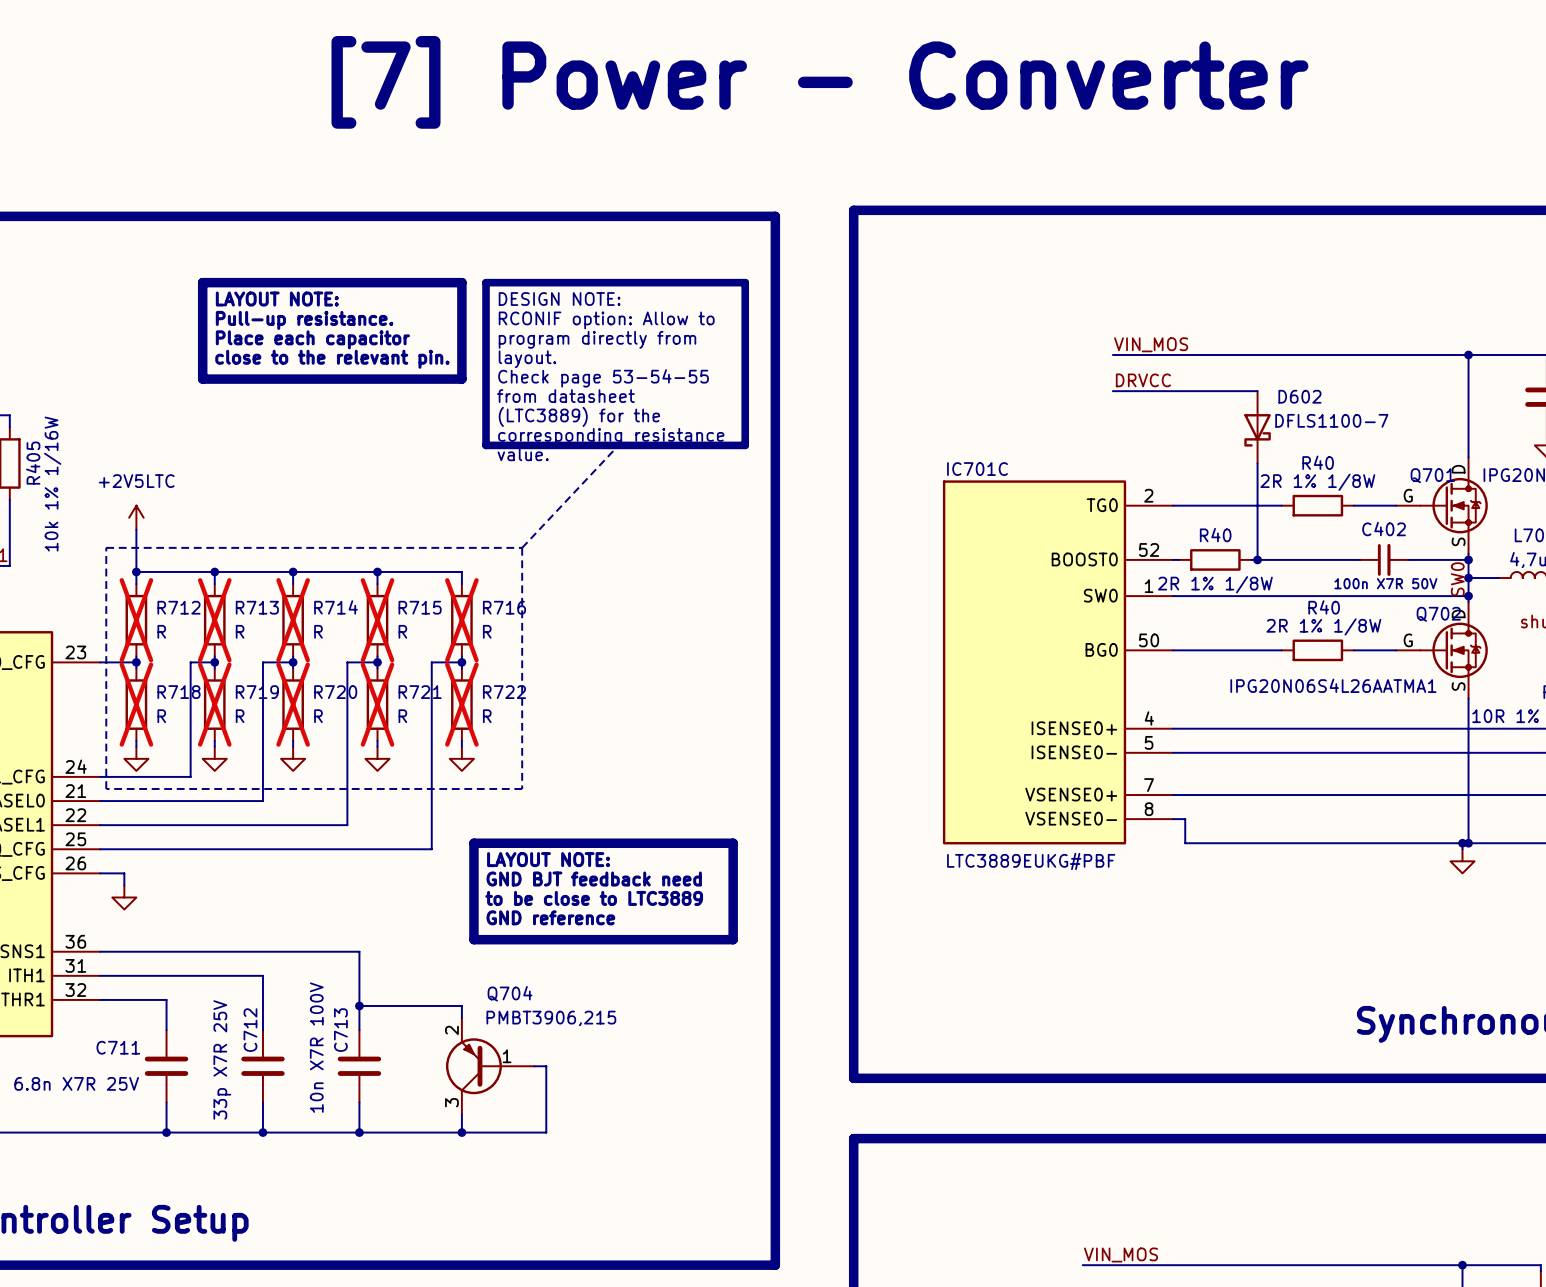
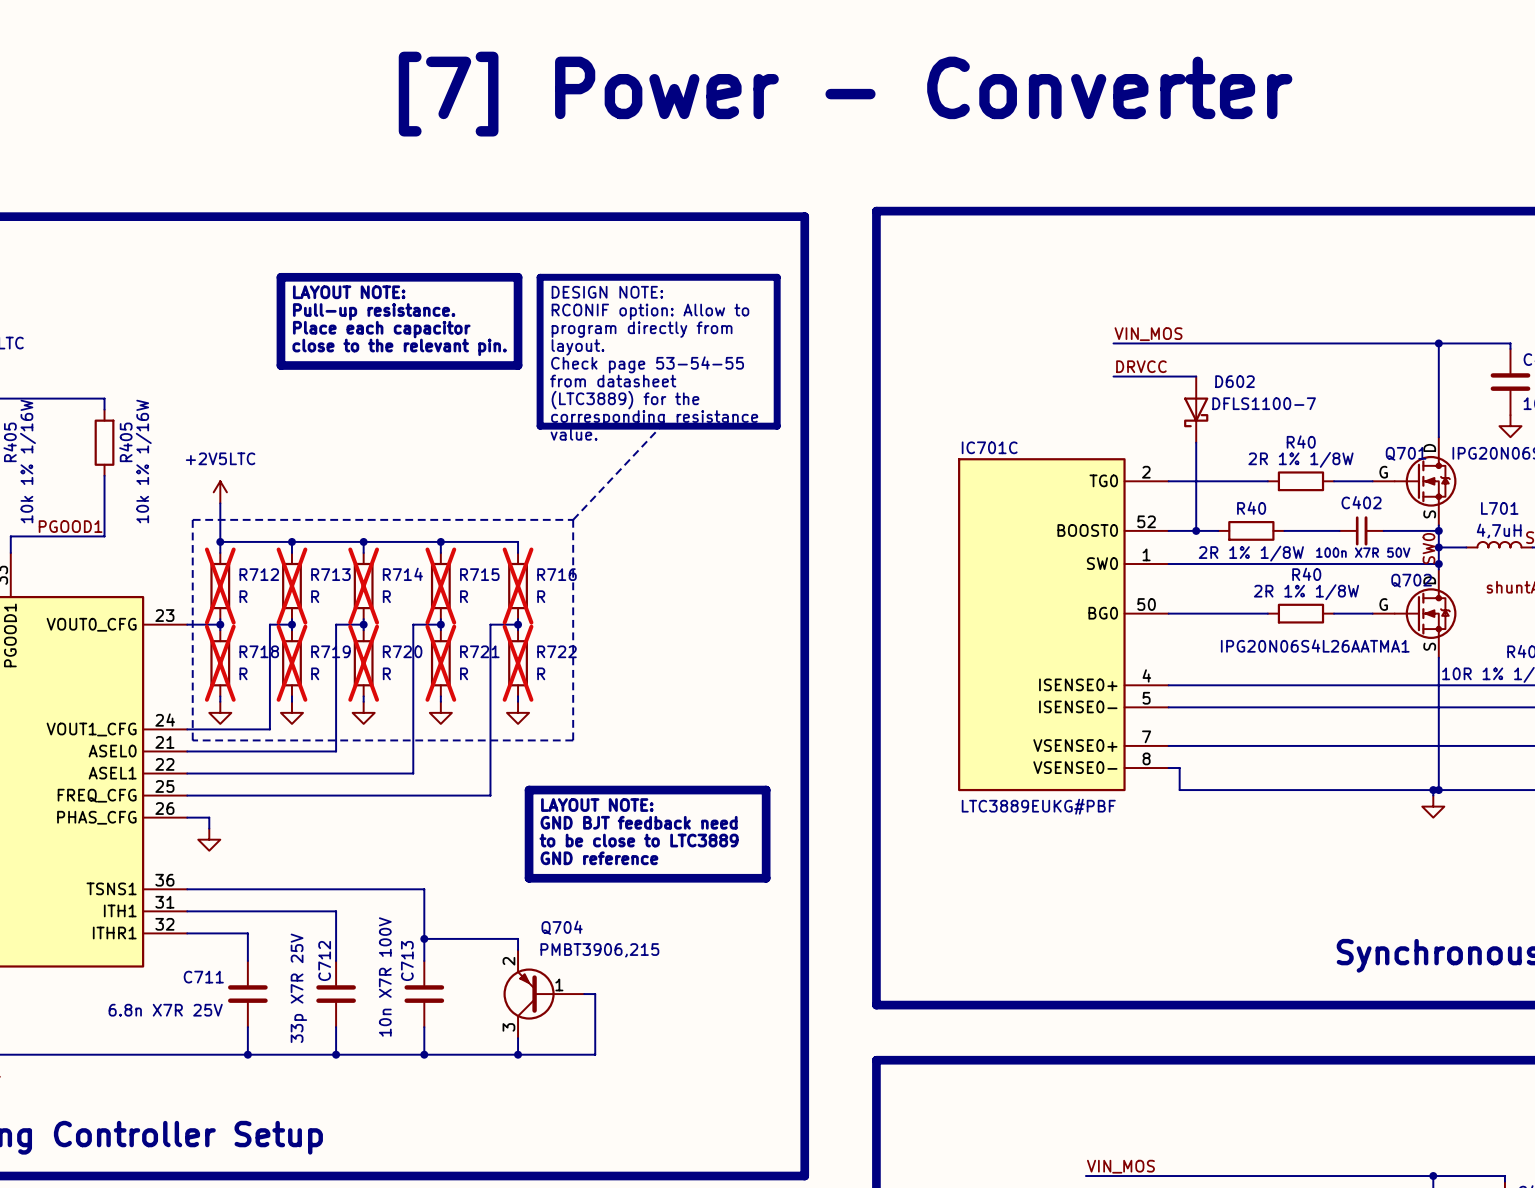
wire: (1203, 391) (1257, 391) -> none
D602 position: (1257, 427) -> (1196, 409)
wire: (1257, 463) (1257, 559) -> (1196, 442) (1196, 530)
R40 position: (1215, 559) -> (1251, 530)
wire: (1251, 559) (1299, 559) -> (1174, 530) (1218, 530)
junction position: (1257, 559) -> (1196, 530)

